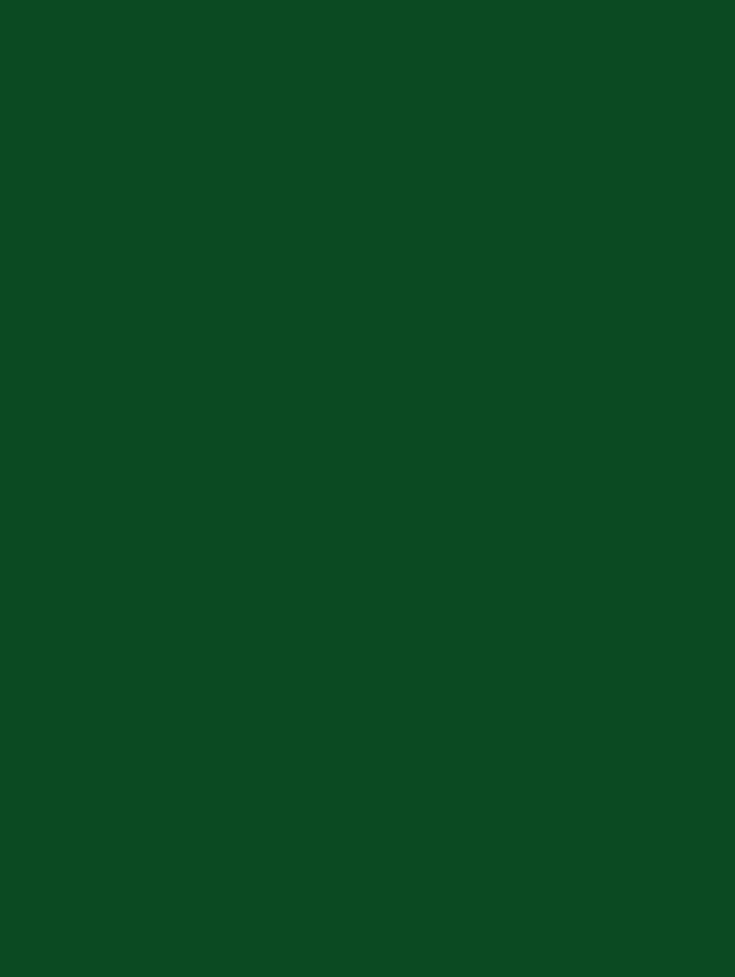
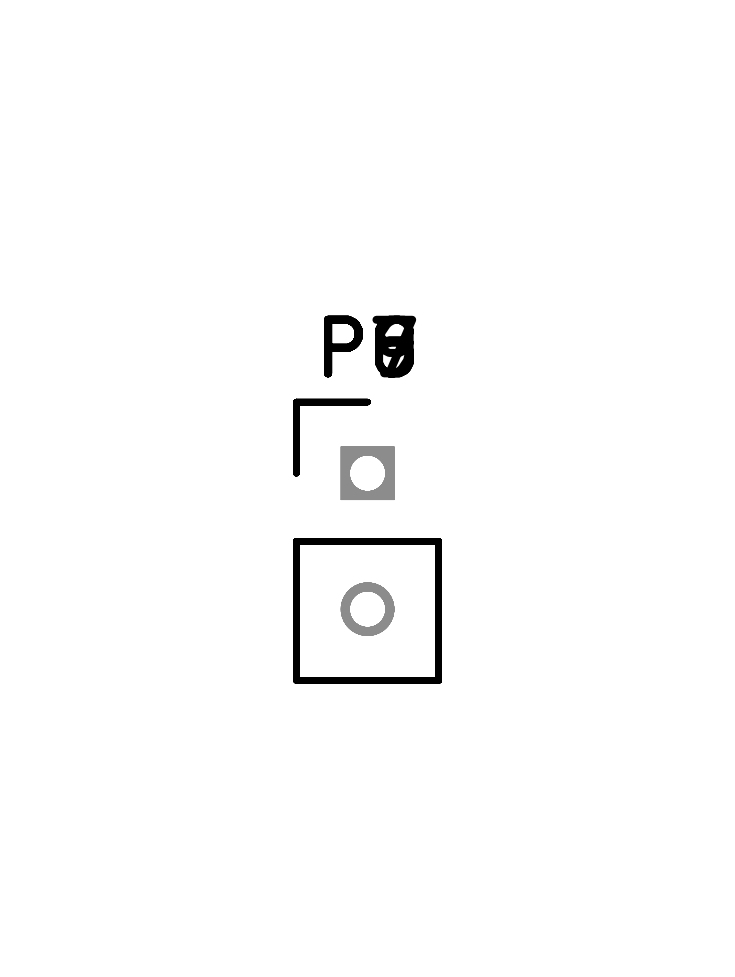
part: none -> (367, 541)
part: none -> (367, 541)
part: none -> (367, 541)
part: none -> (367, 541)

